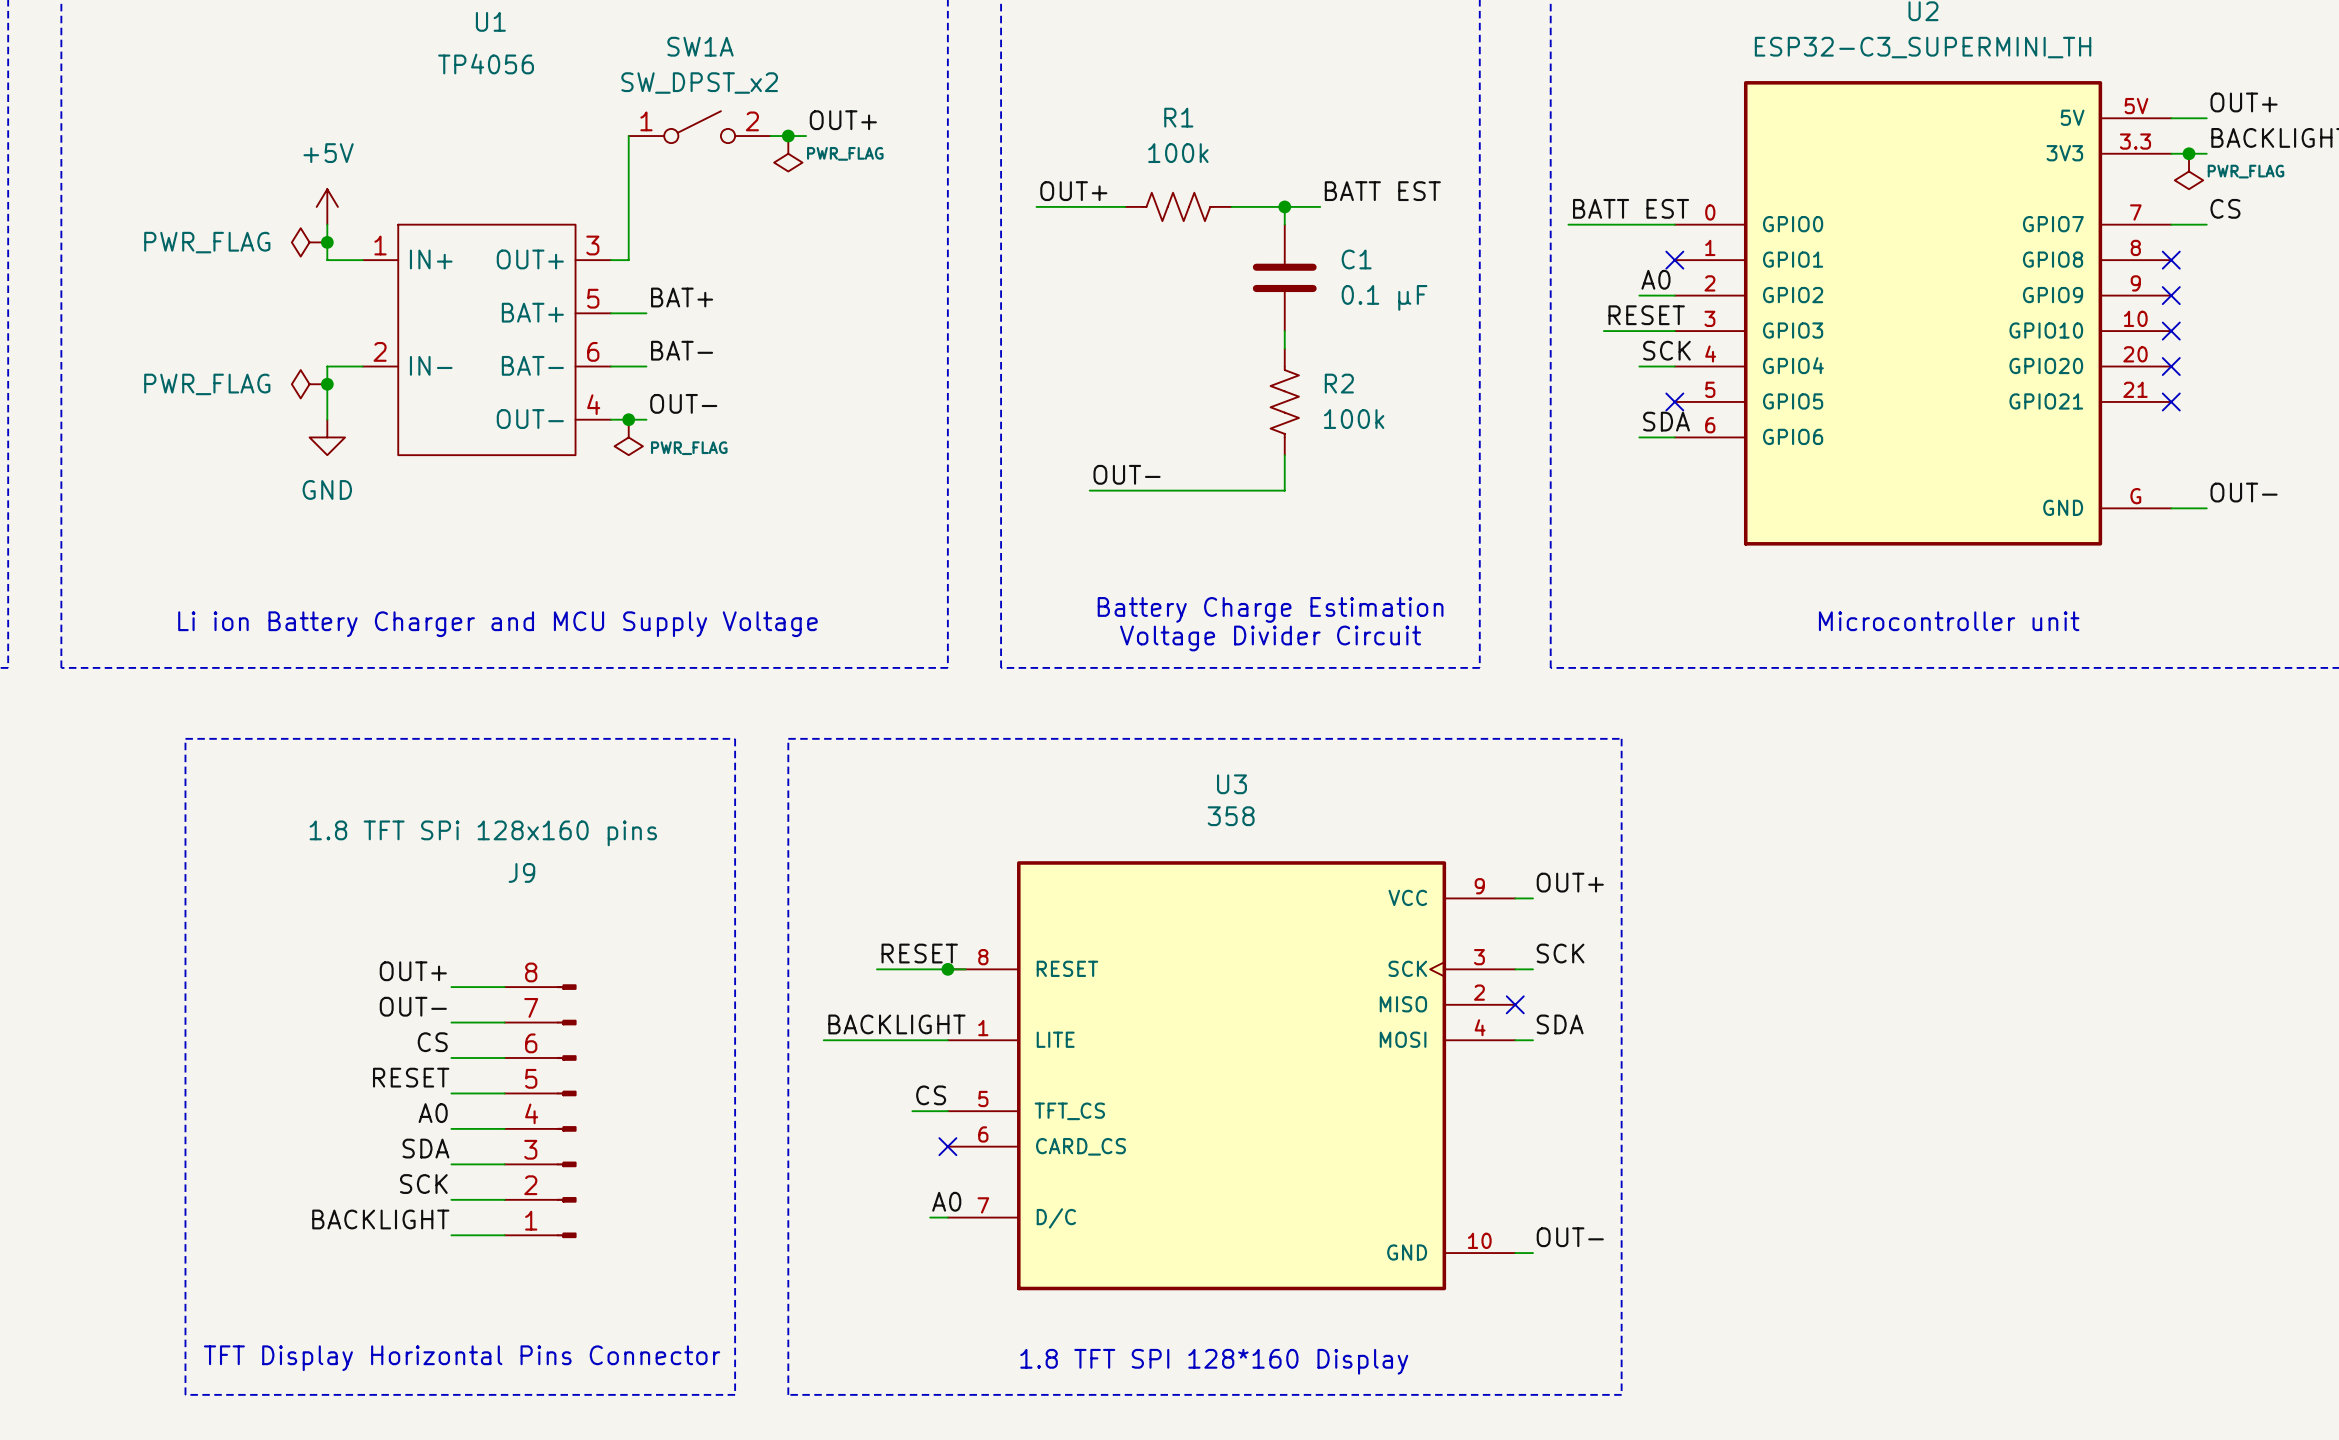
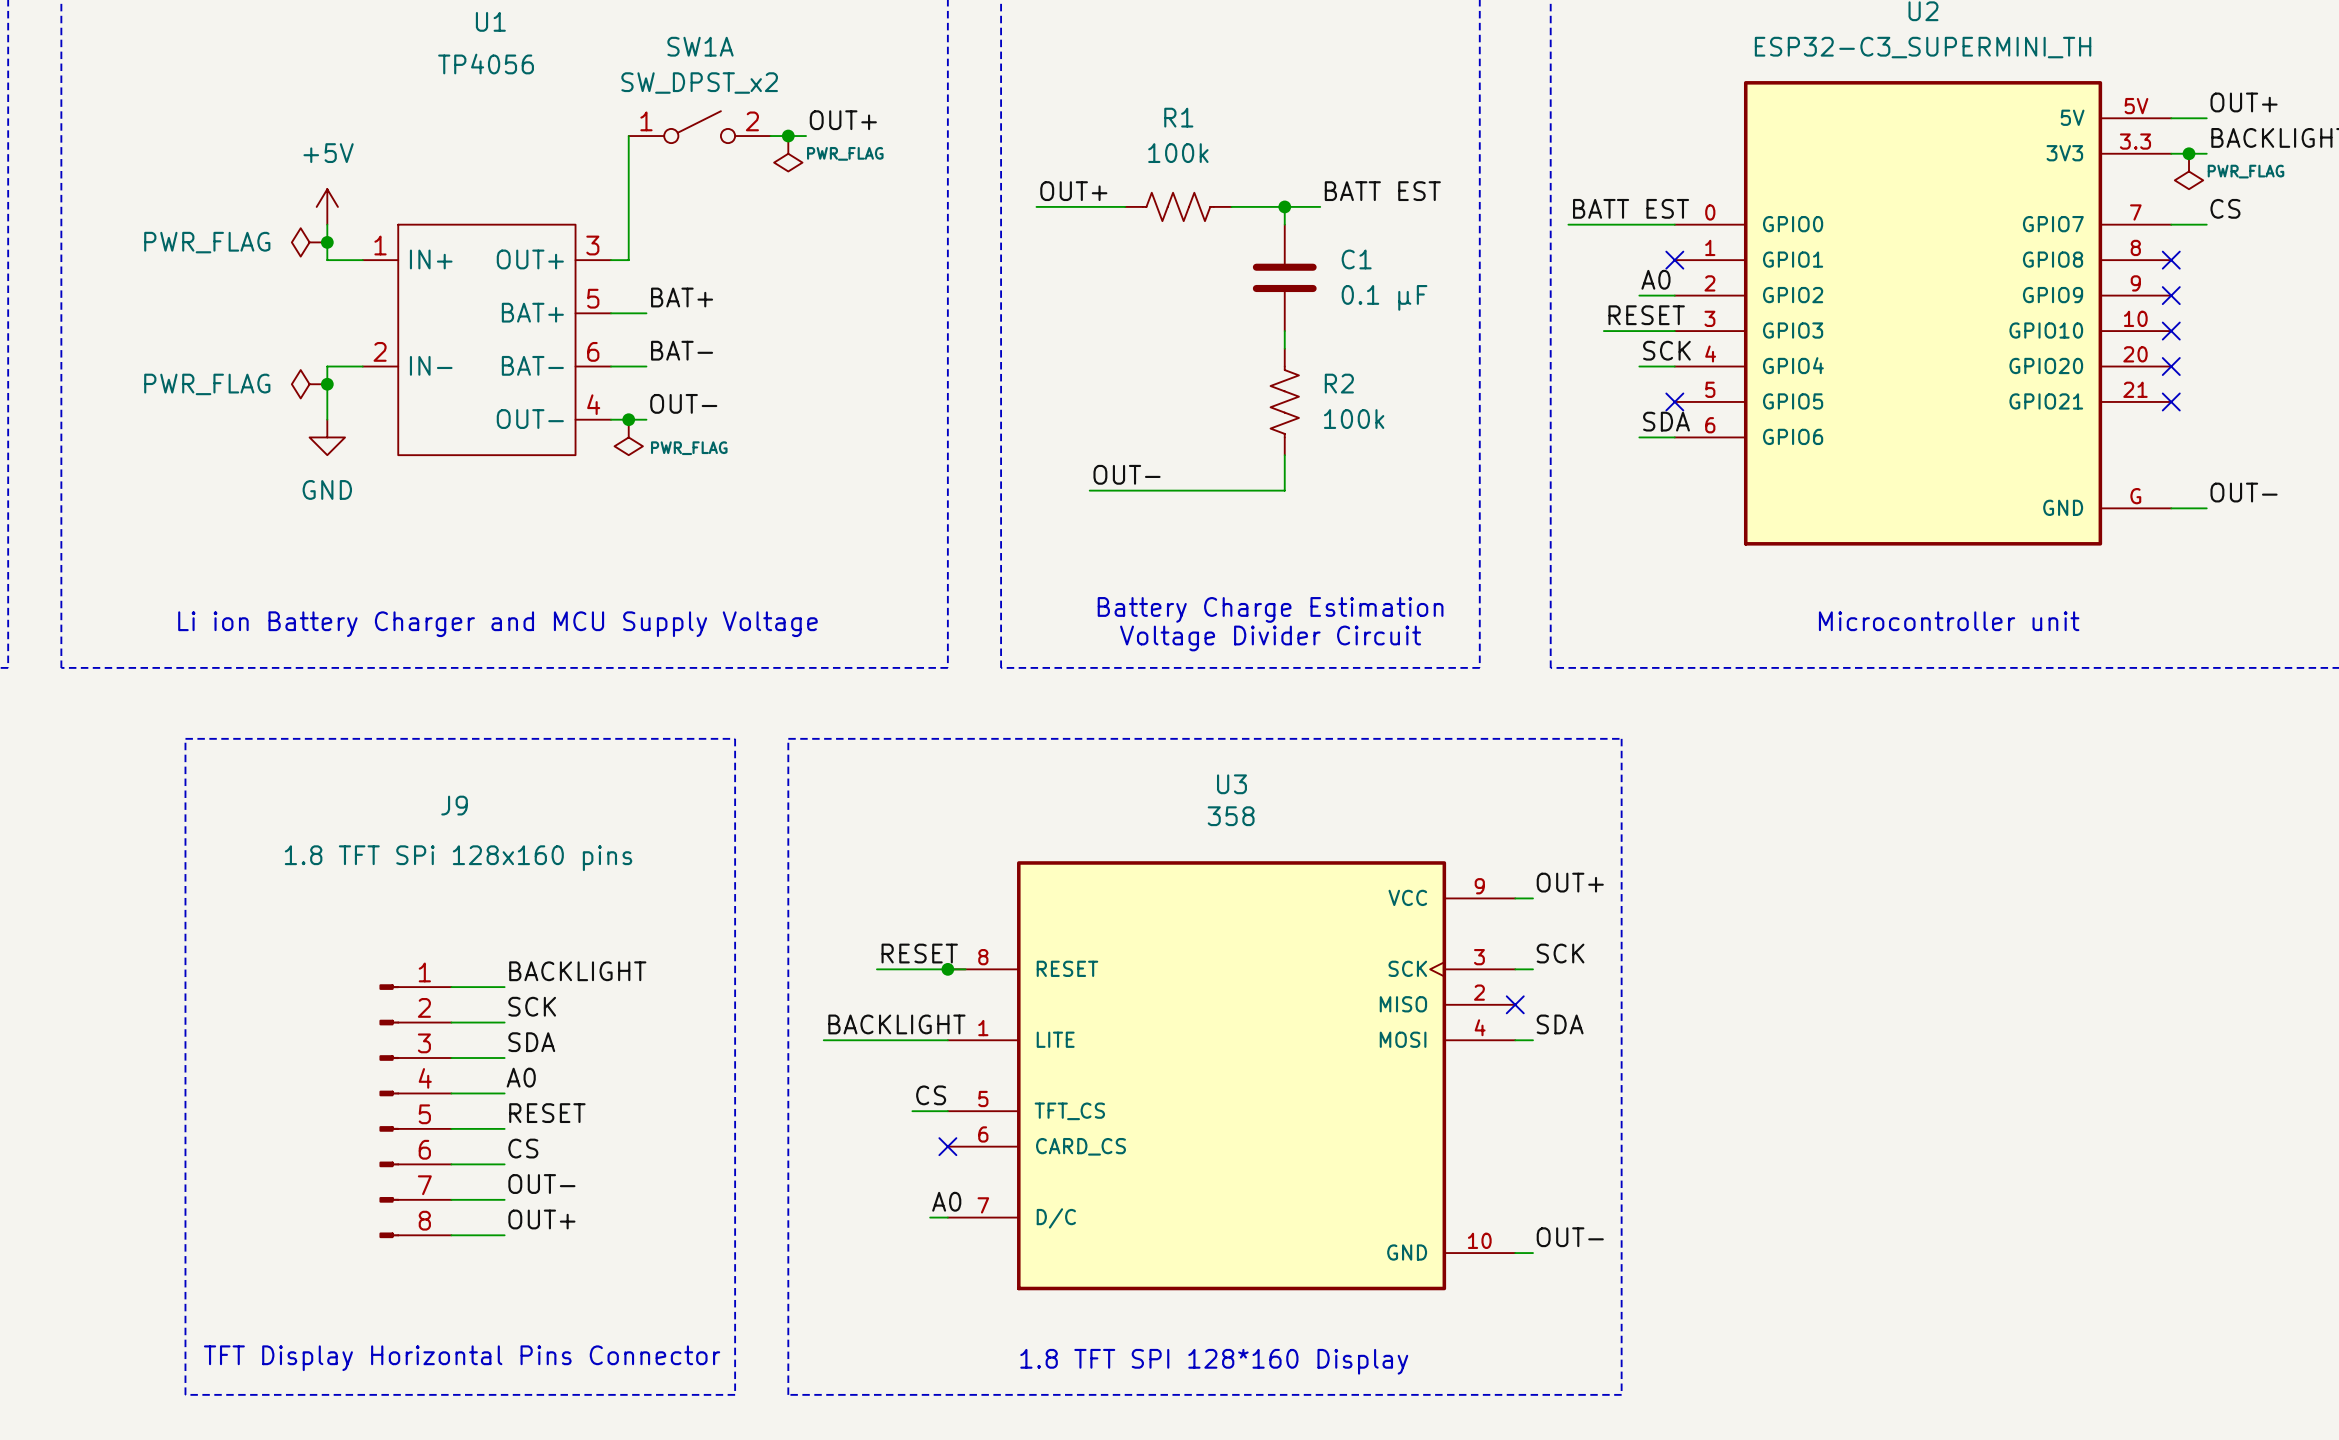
J9 value position: 1.8 TFT SPi 128x160 pins (483, 833) -> 1.8 TFT SPi 128x160 pins (458, 858)
J9 name position: J9 (521, 872) -> J9 (454, 805)
label position: OUT+ (413, 971) -> OUT+ (541, 1219)
label position: OUT- (413, 1006) -> OUT- (541, 1184)
label position: CS (432, 1042) -> CS (523, 1148)
label position: RESET (411, 1077) -> RESET (547, 1113)
J9 rotation: 0° (566, 1111) -> 180° (389, 1111)
label position: A0 (433, 1113) -> A0 (521, 1077)
label position: SDA (425, 1148) -> SDA (531, 1042)
label position: SCK (423, 1184) -> SCK (532, 1006)
label position: BACKLIGHT (380, 1219) -> BACKLIGHT (577, 971)

